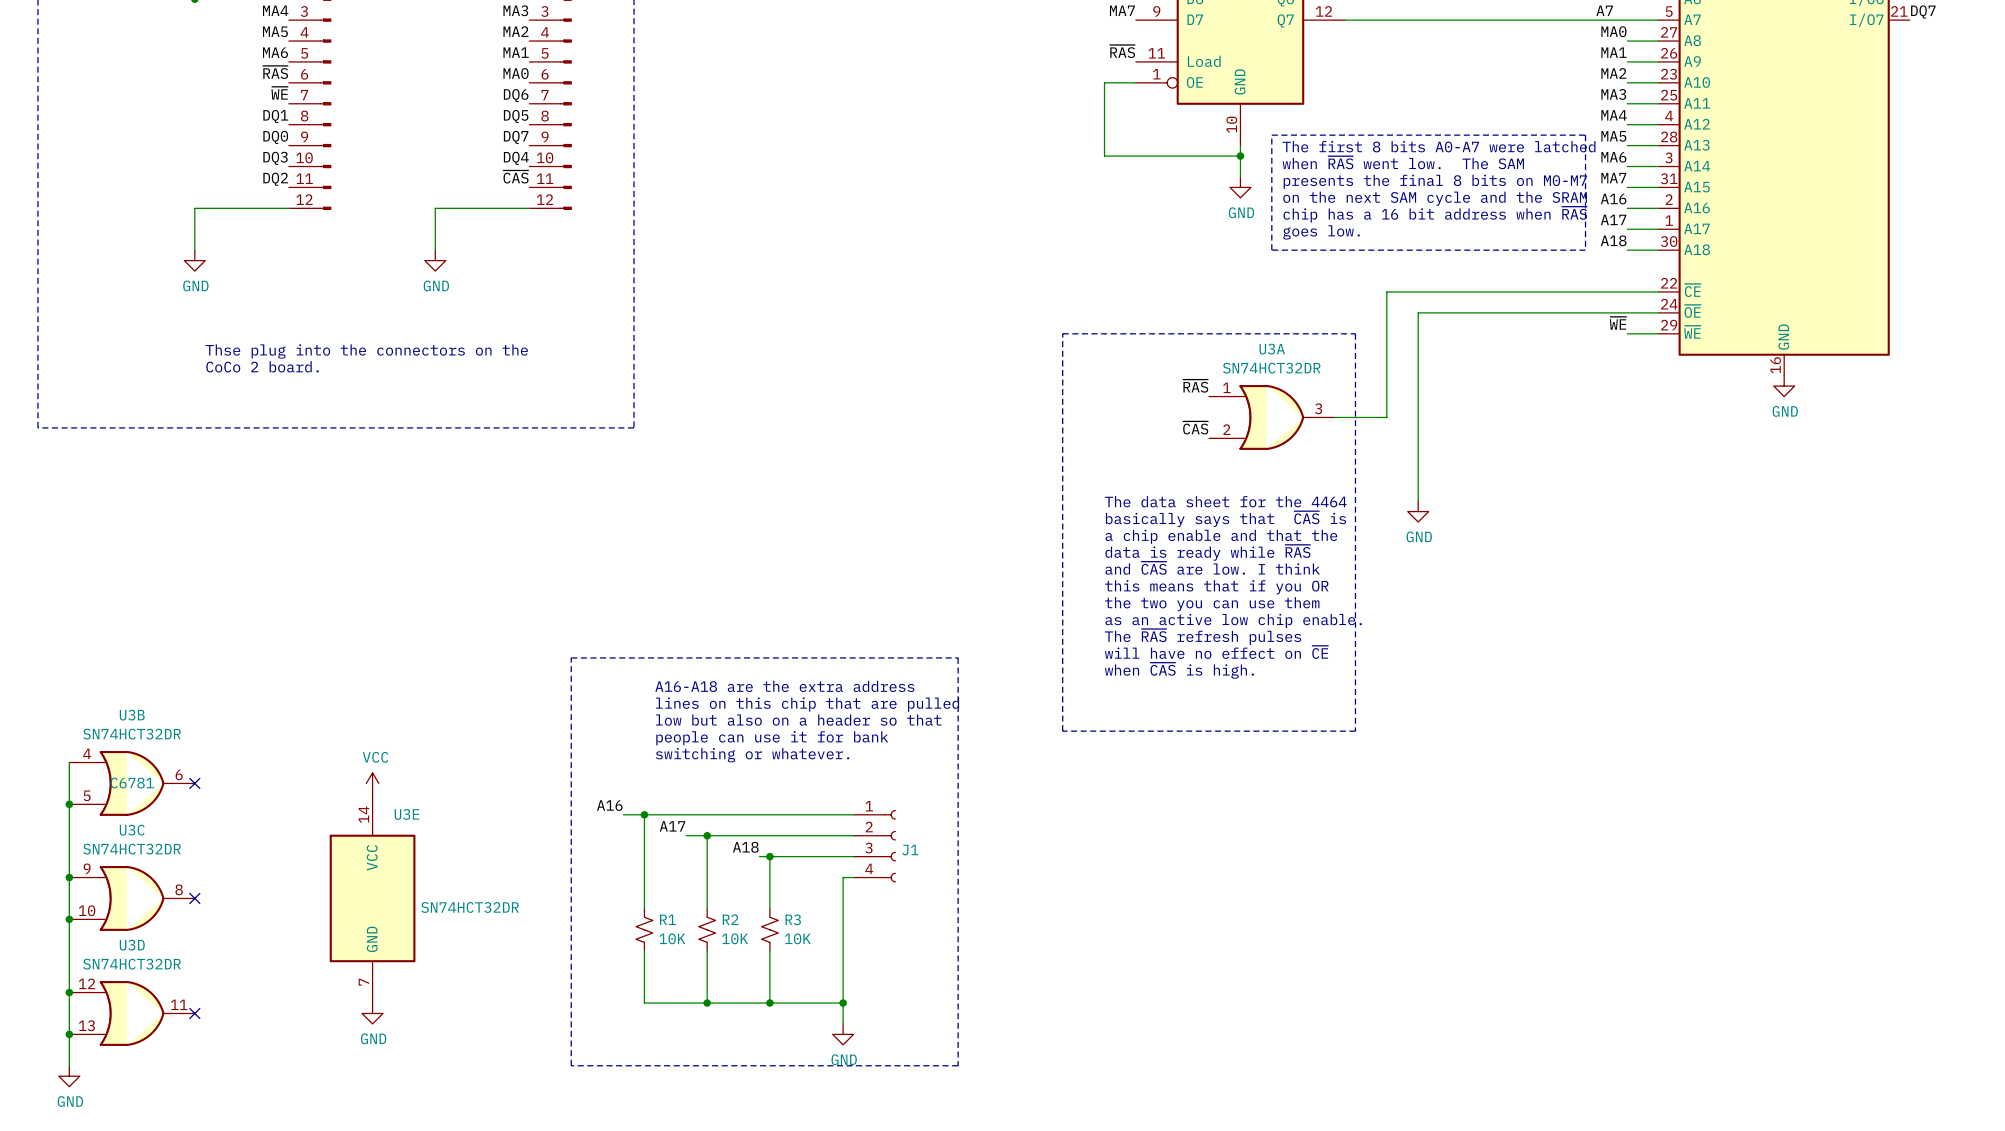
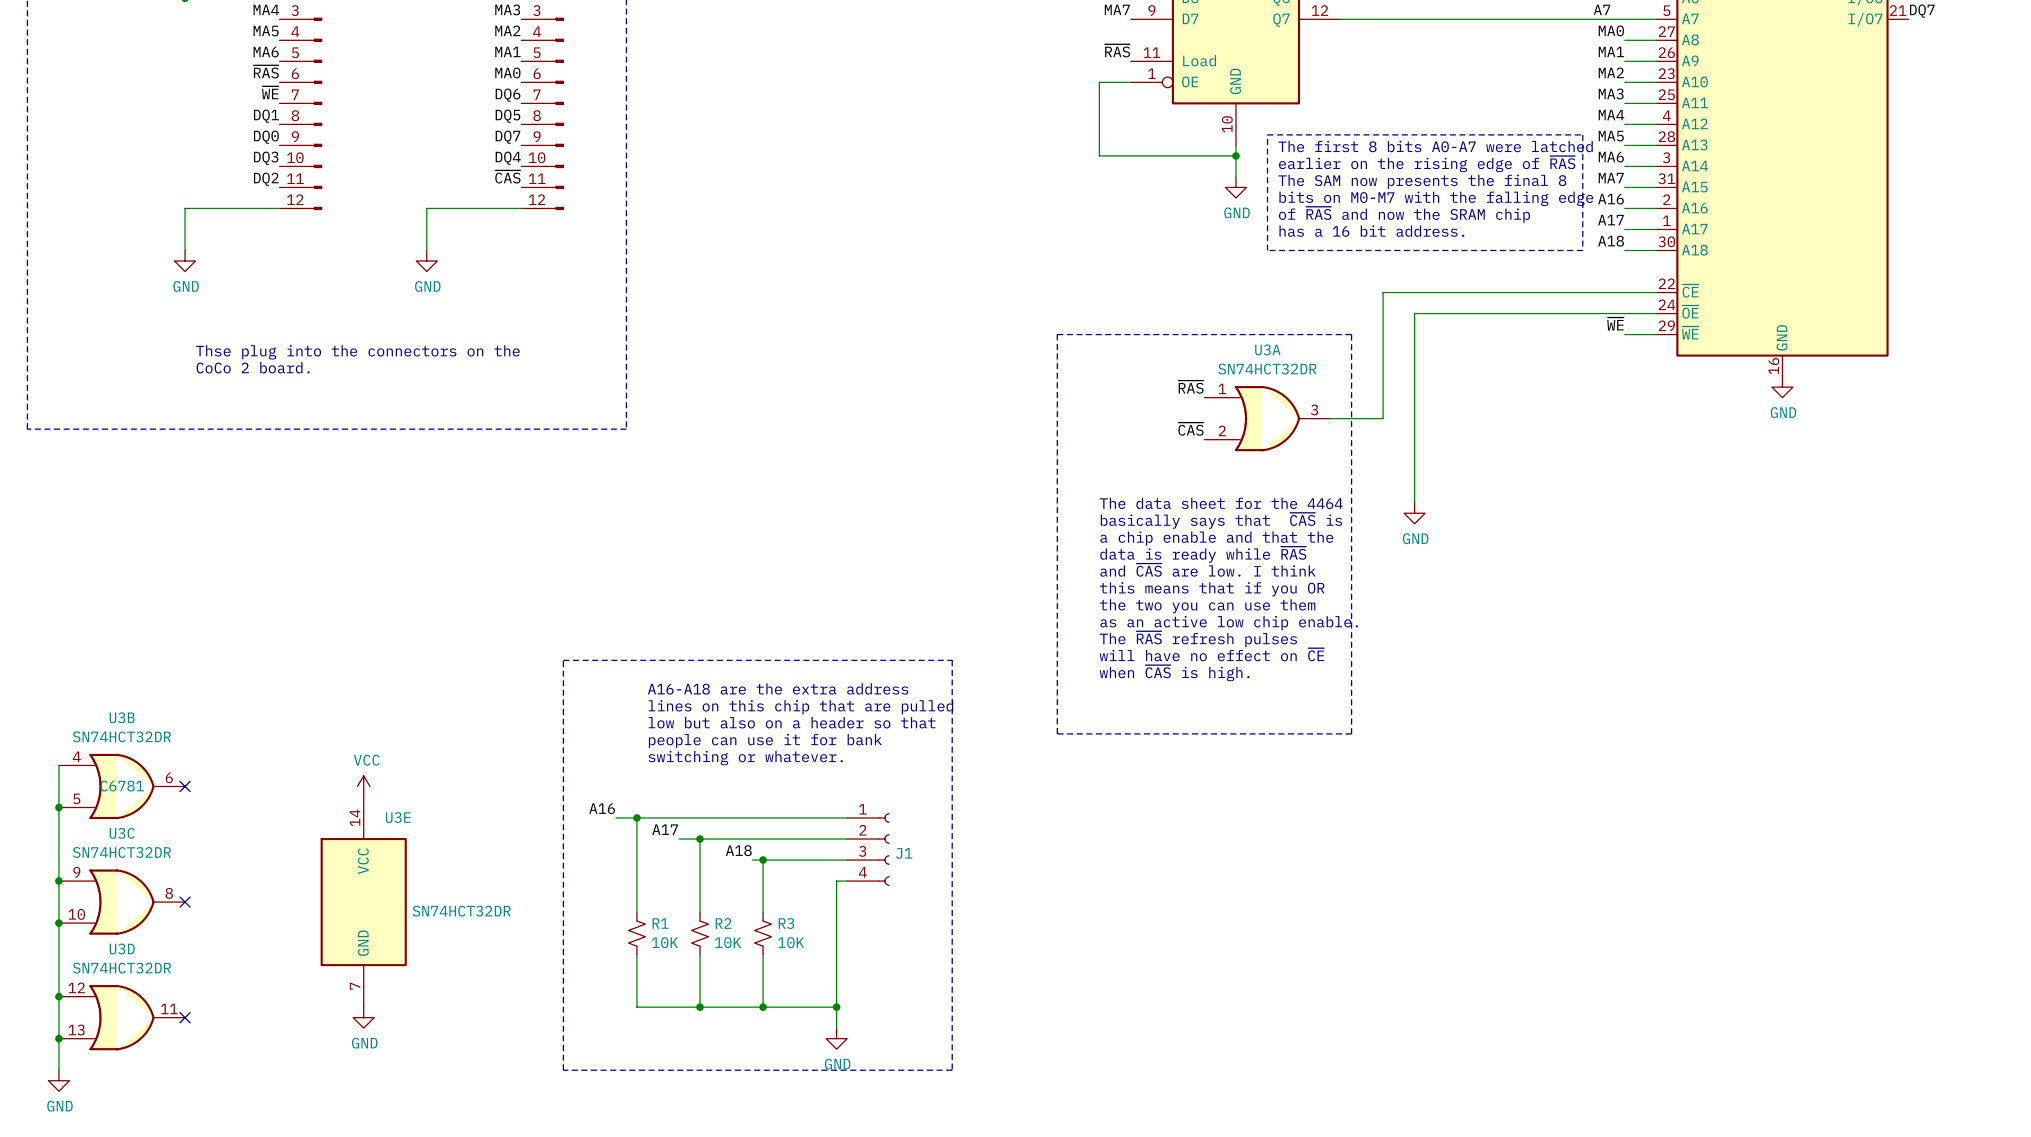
text: when ~{RAS} went low. The SAM (1403, 162) -> earlier on the rising edge of ~{RAS} (1427, 164)
text: presents the final 8 bits on M0-M7 (1435, 181) -> The SAM now presents the final 8 (1422, 181)
text: on the next SAM cycle and the SRAM (1435, 198) -> bits on M0-M7 with the falling edge (1436, 198)
text: chip has a 16 bit address when ~{RAS} (1435, 214) -> of ~{RAS} and now the SRAM chip (1404, 214)
text: goes low. (1321, 232) -> has a 16 bit address. (1371, 231)

